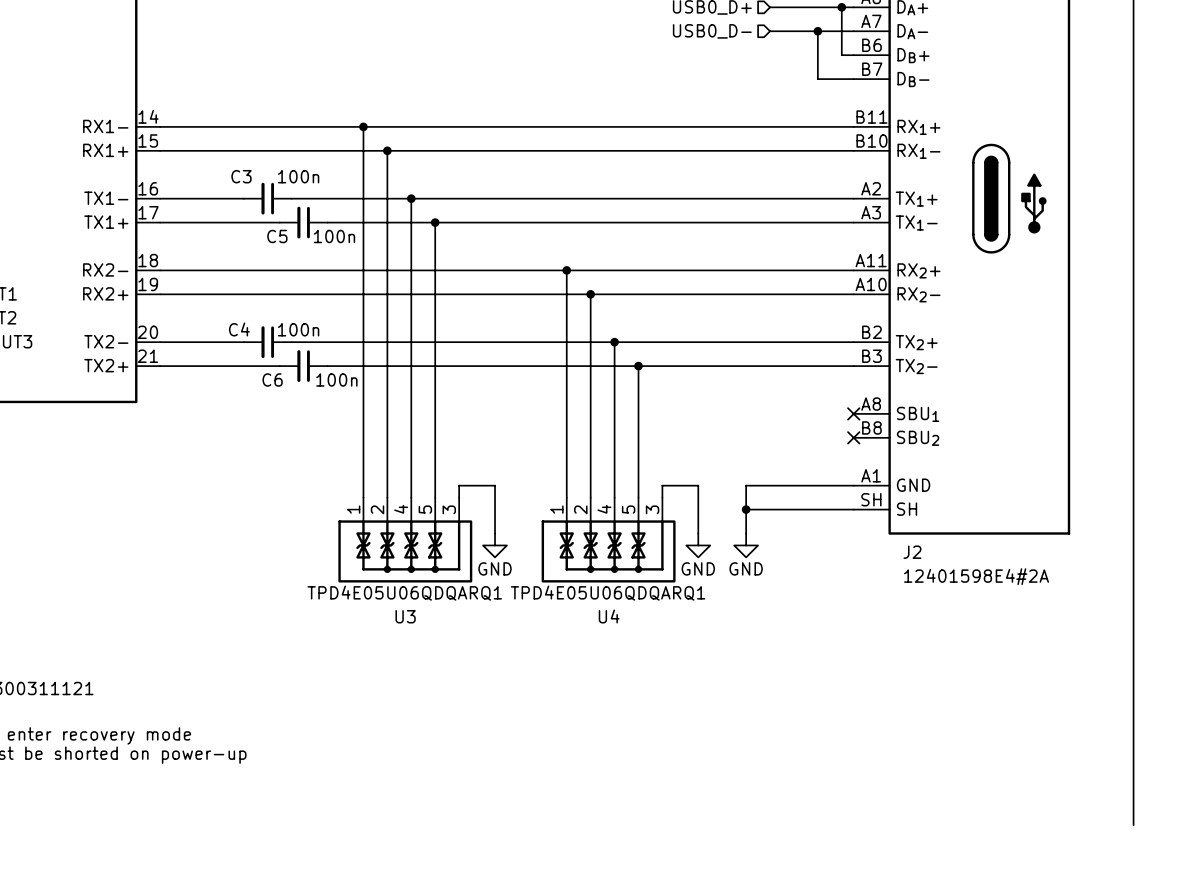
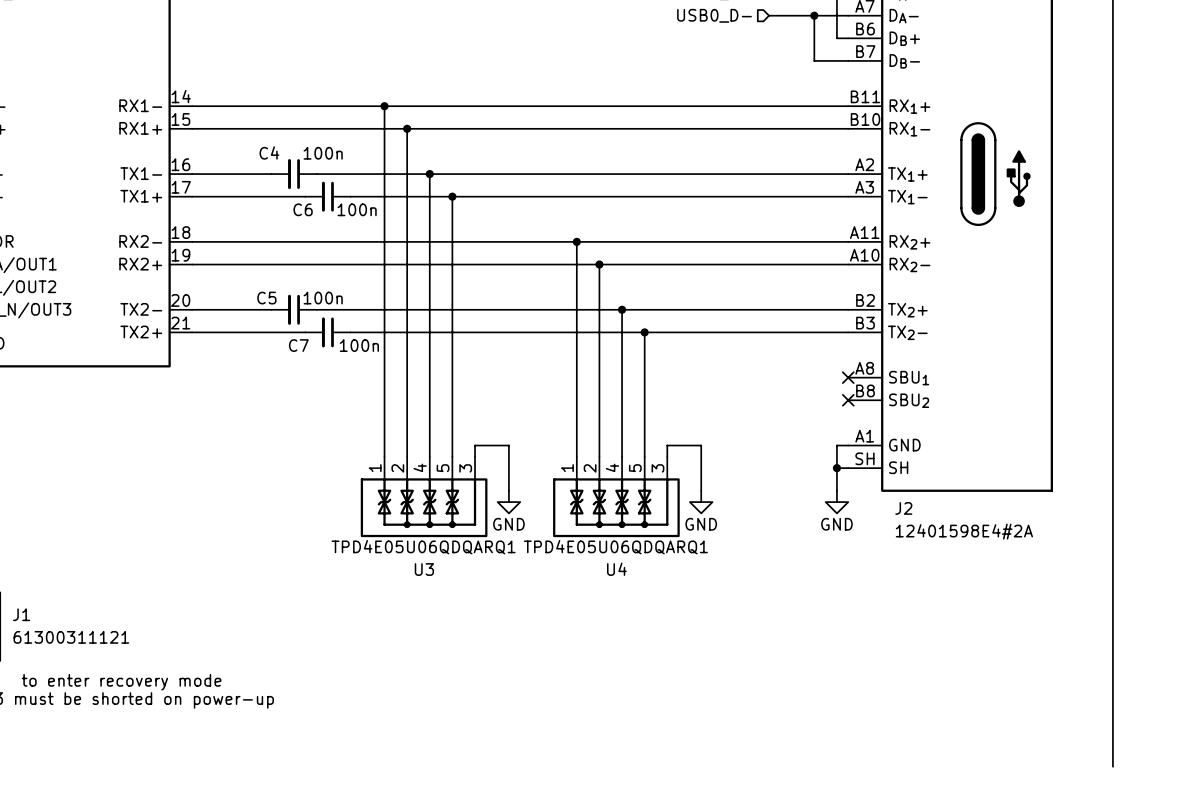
C3 name: C3 (241, 176) -> C4 (269, 153)
C5 name: C5 (277, 236) -> C6 (303, 209)
C4 name: C4 (239, 329) -> C5 (266, 298)
C6 name: C6 (272, 379) -> C7 (298, 345)
wire: (841, 485) (746, 485) (746, 533) -> (836, 445) (836, 490)
wire: (746, 509) (841, 509) -> none
junction: (746, 509) -> none
junction: none -> (836, 468)
power symbol position: GND (746, 545) -> GND (836, 502)

